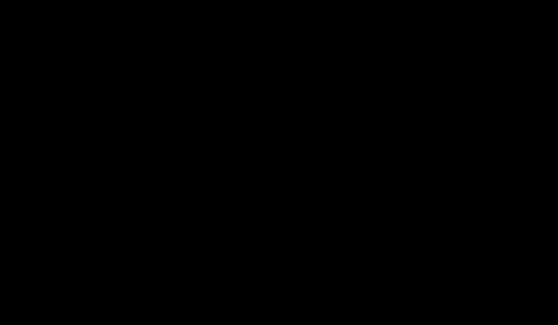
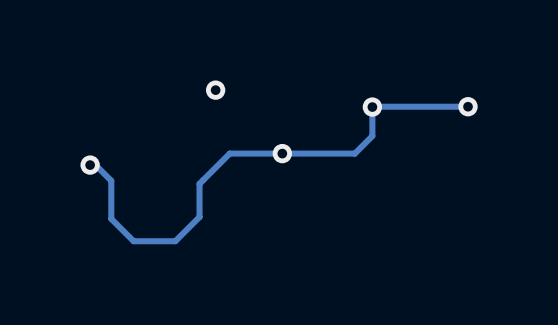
via: none -> (215, 90)
track: none -> (468, 106) (372, 106) (372, 136) (354, 153) (229, 153) (199, 183) (199, 217) (175, 241) (133, 241) (111, 218) (111, 180) (95, 165) (90, 165)
via: none -> (468, 106)
via: none -> (372, 107)
via: none -> (282, 153)
via: none -> (90, 165)

